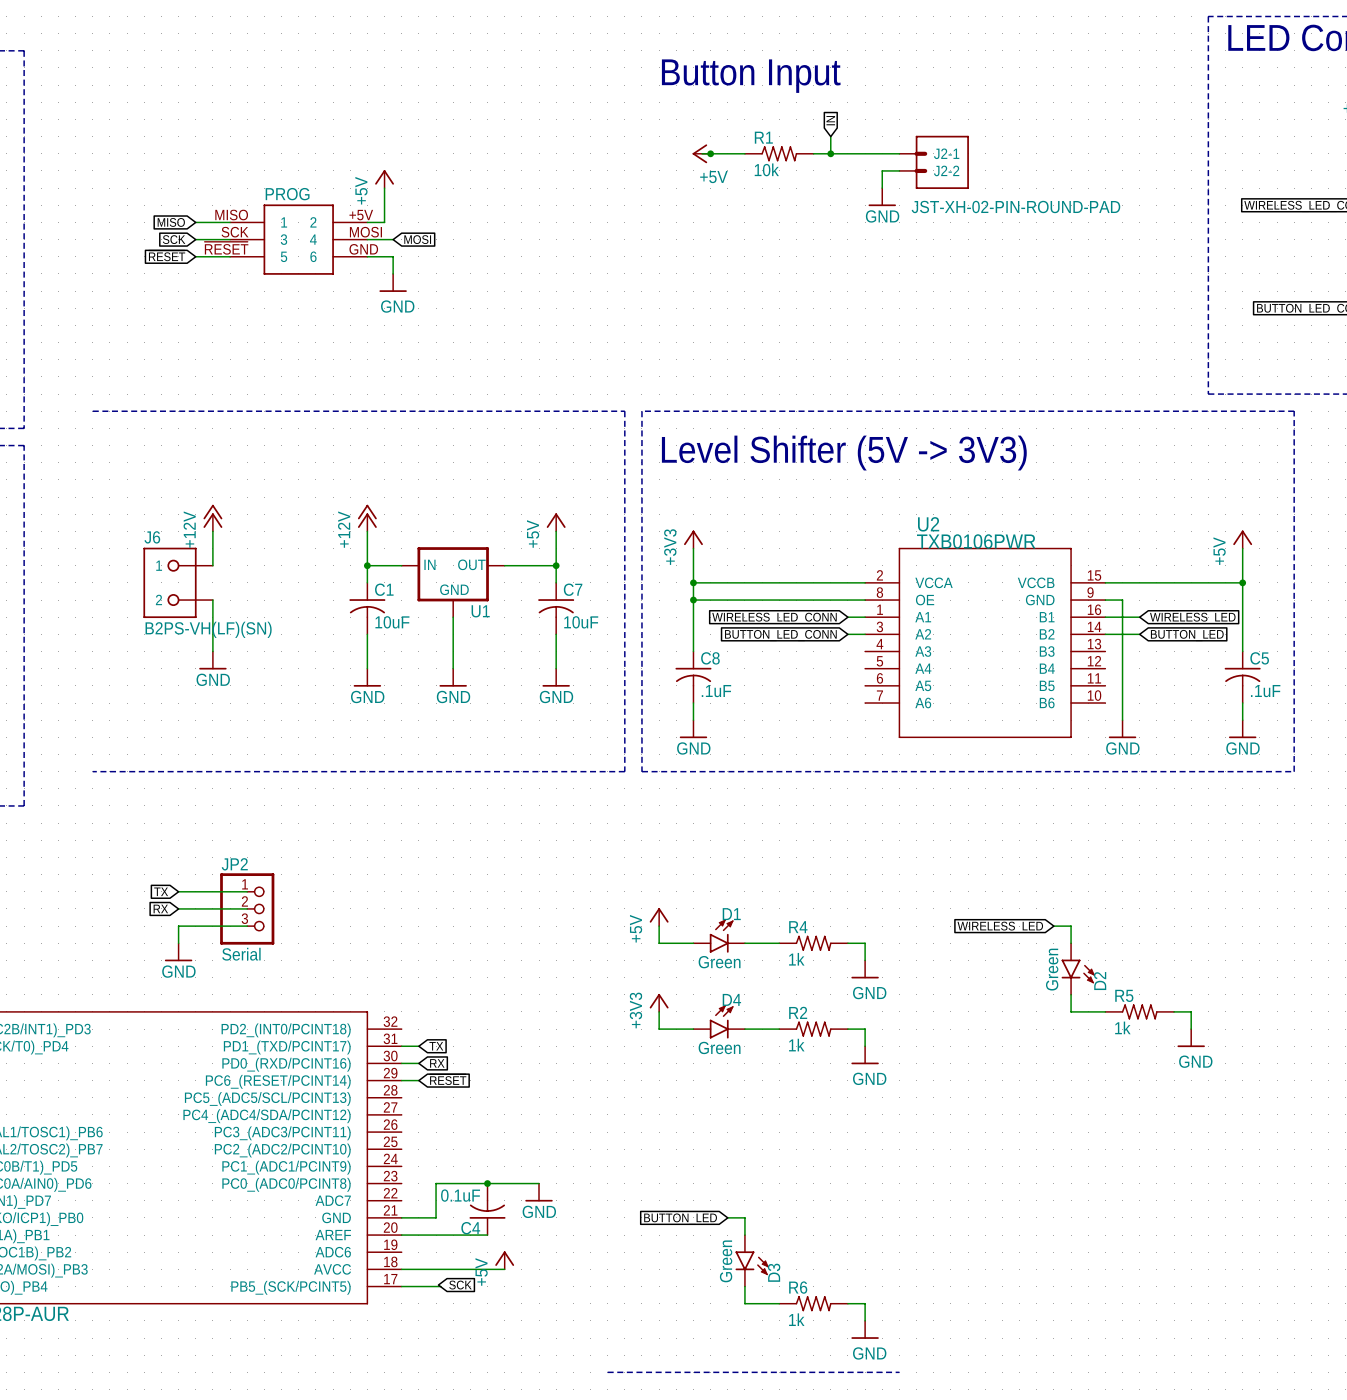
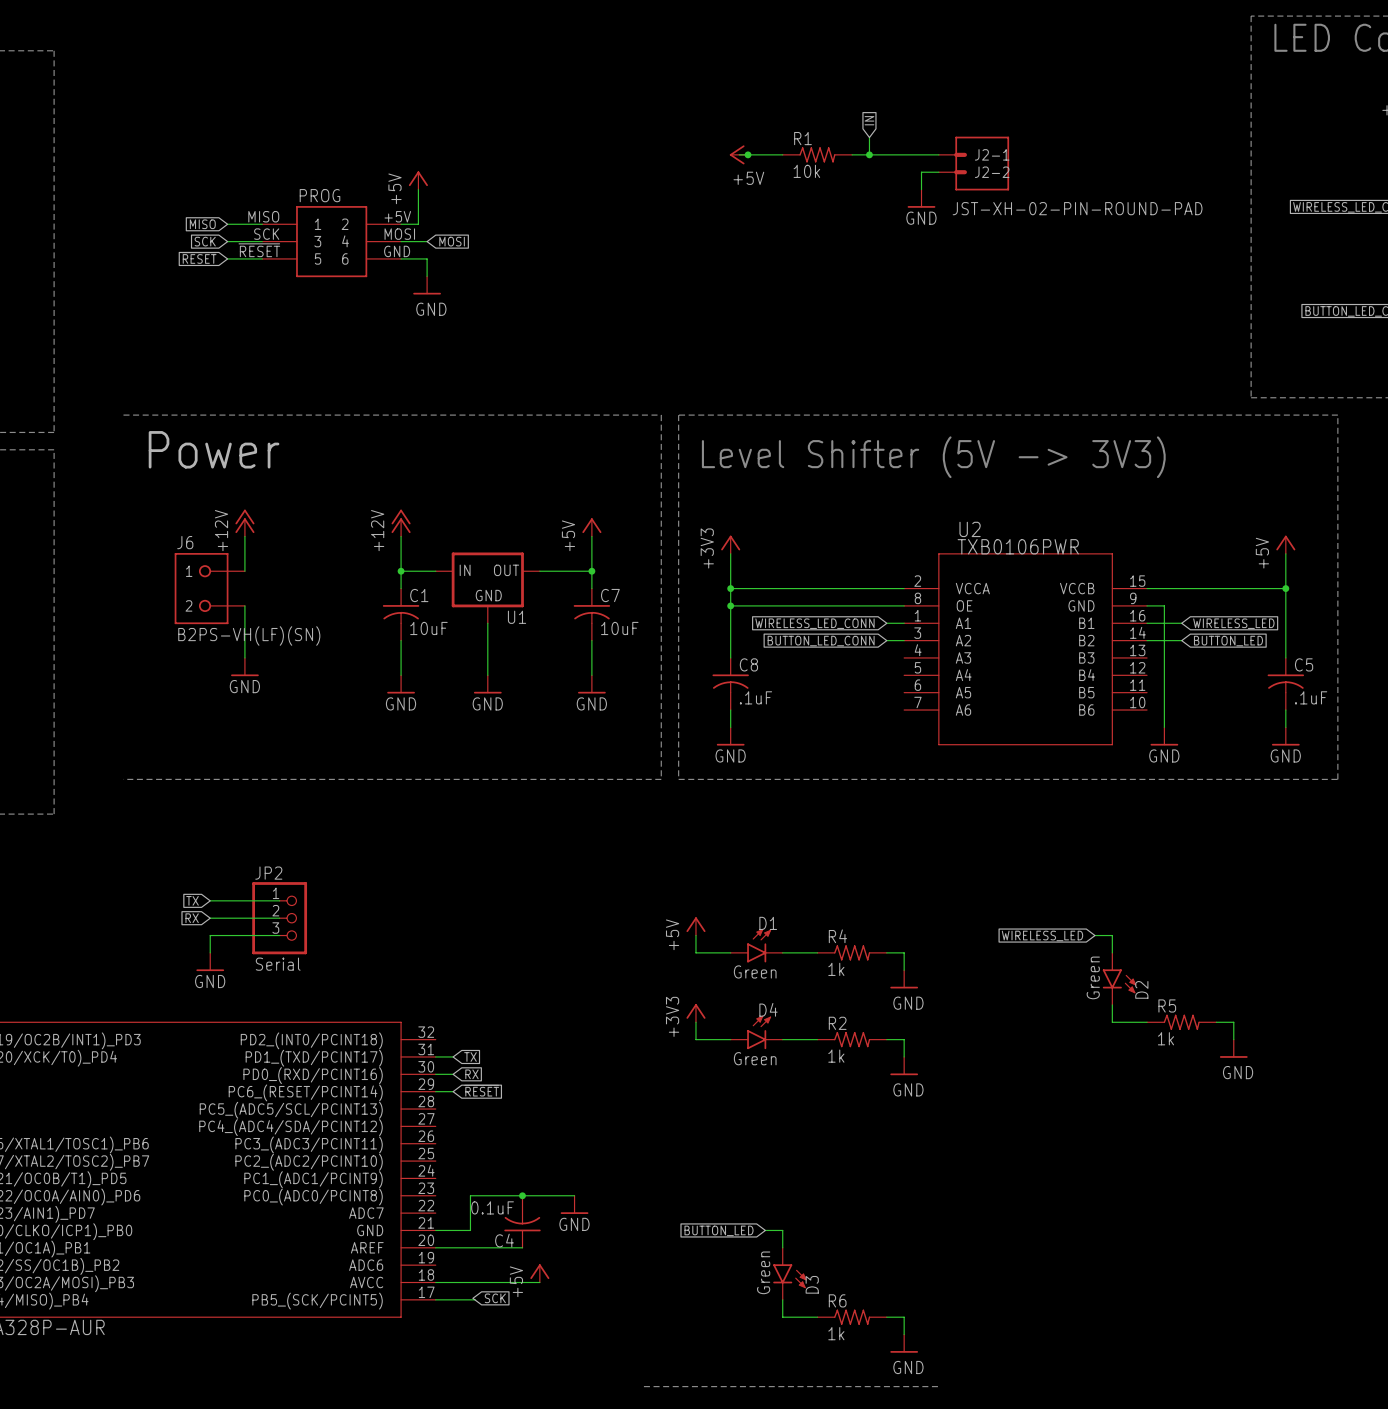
text: Button Input (751, 76) -> none
text: none -> Power (214, 449)

